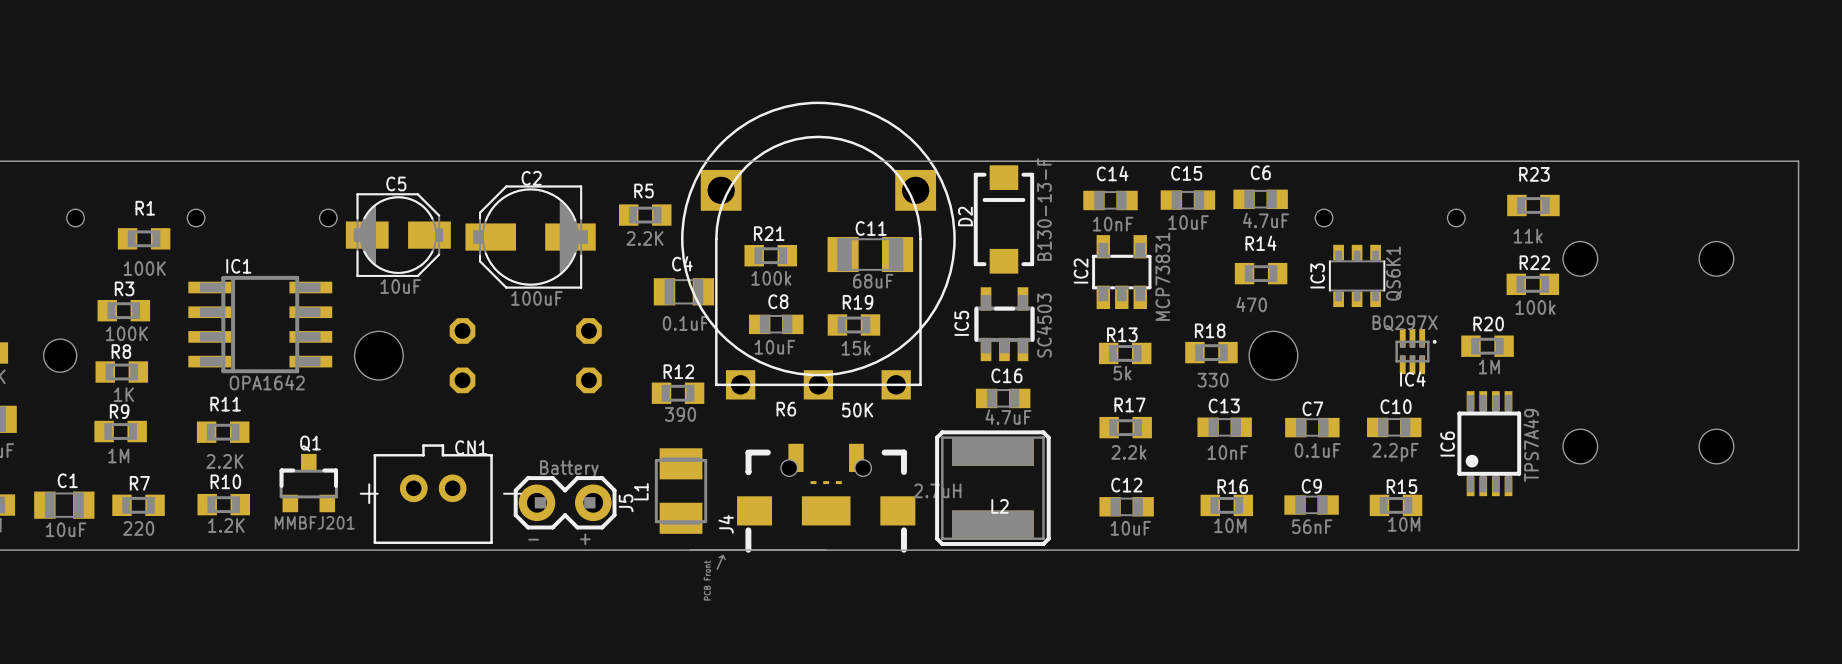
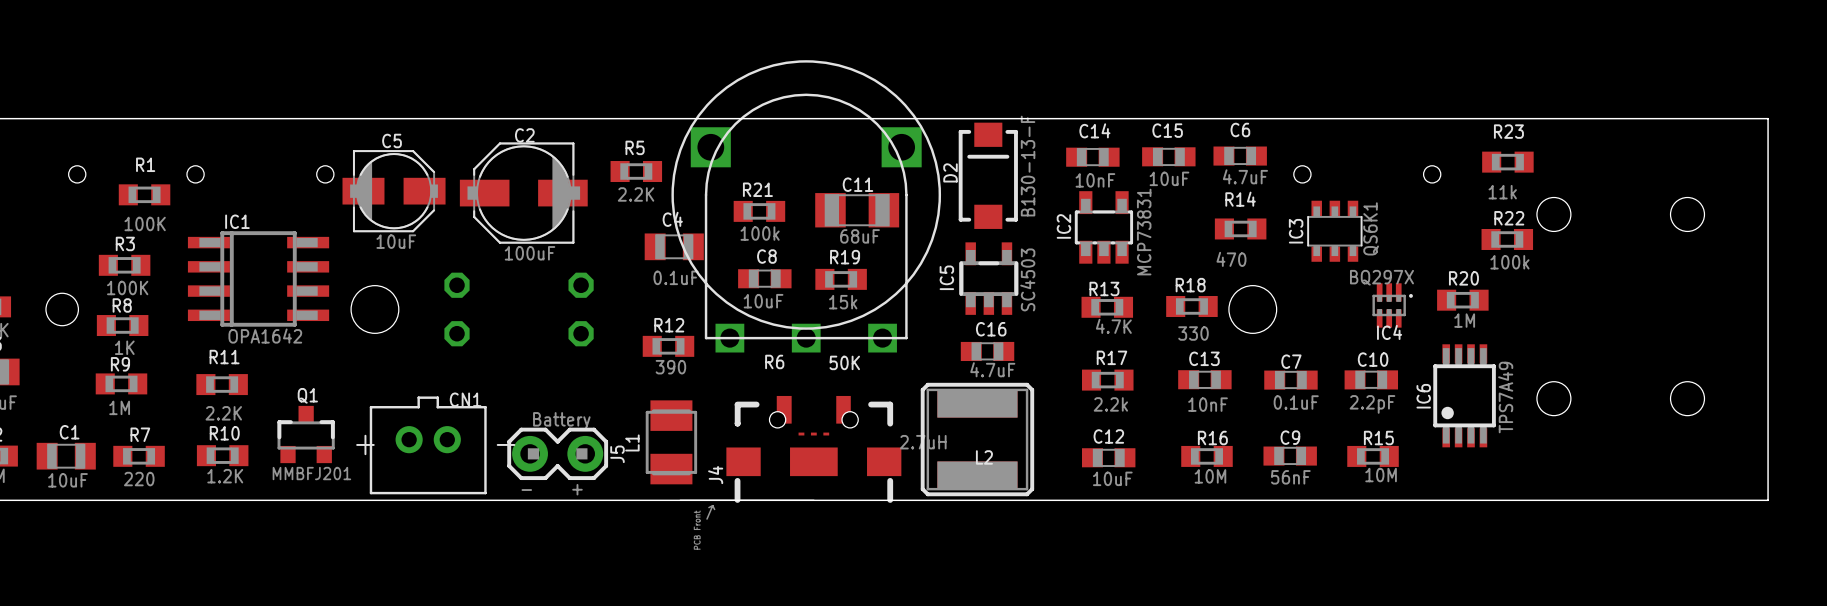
R13 value: 5k (1122, 373) -> 4.7K (1113, 326)

